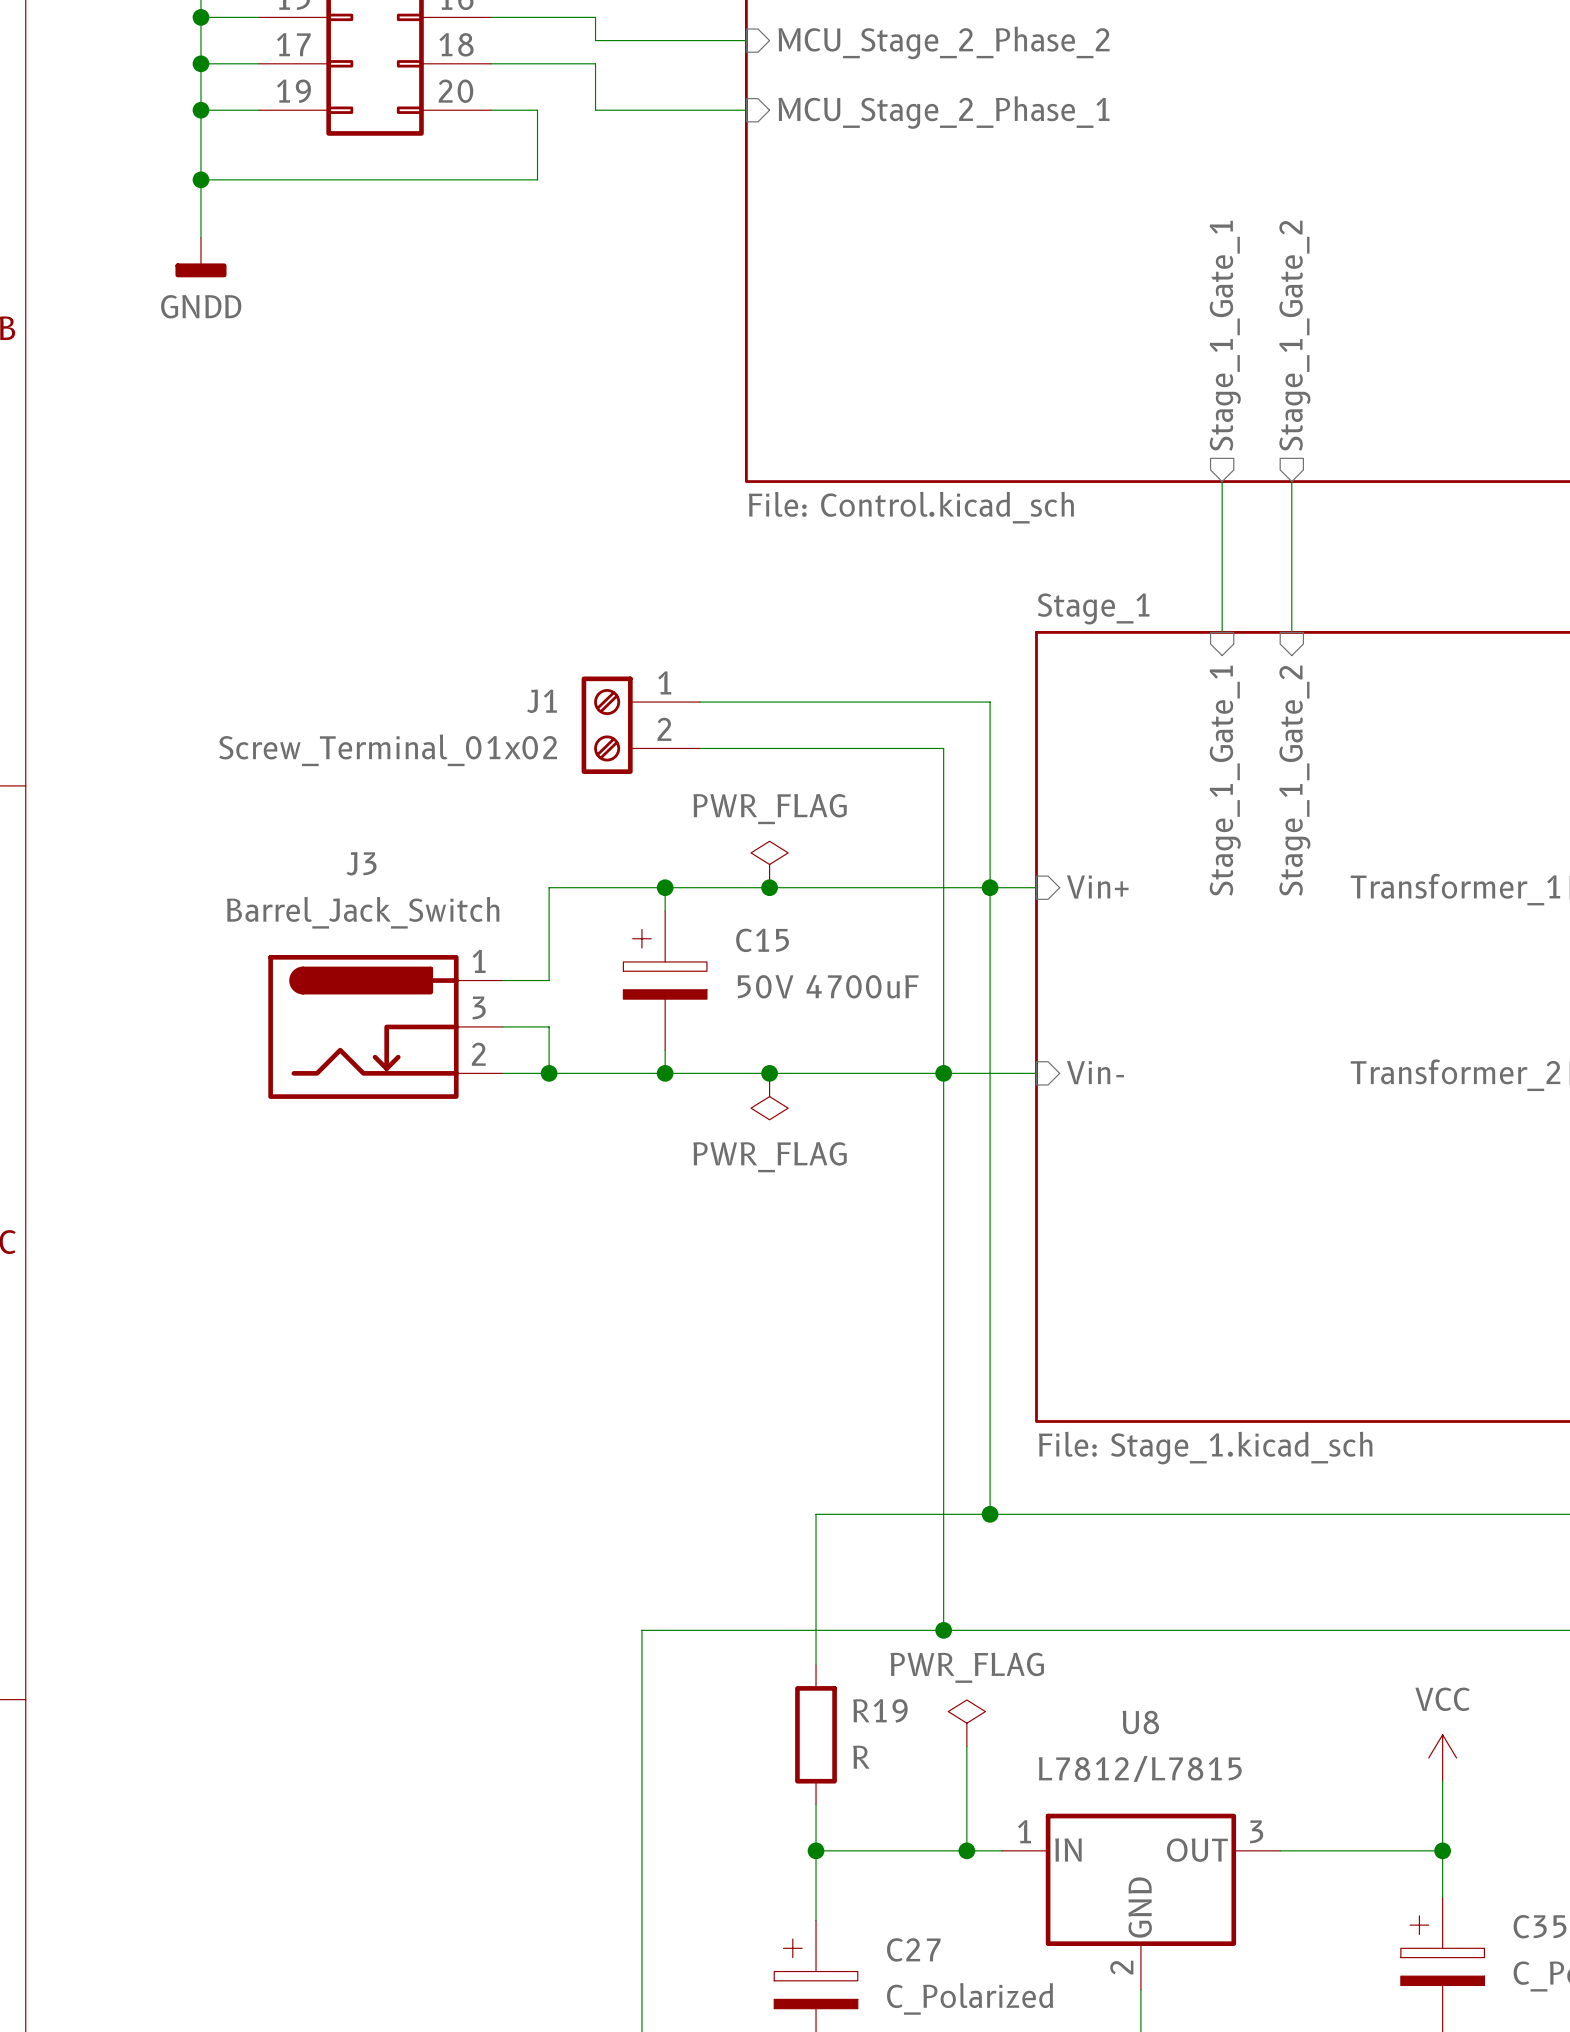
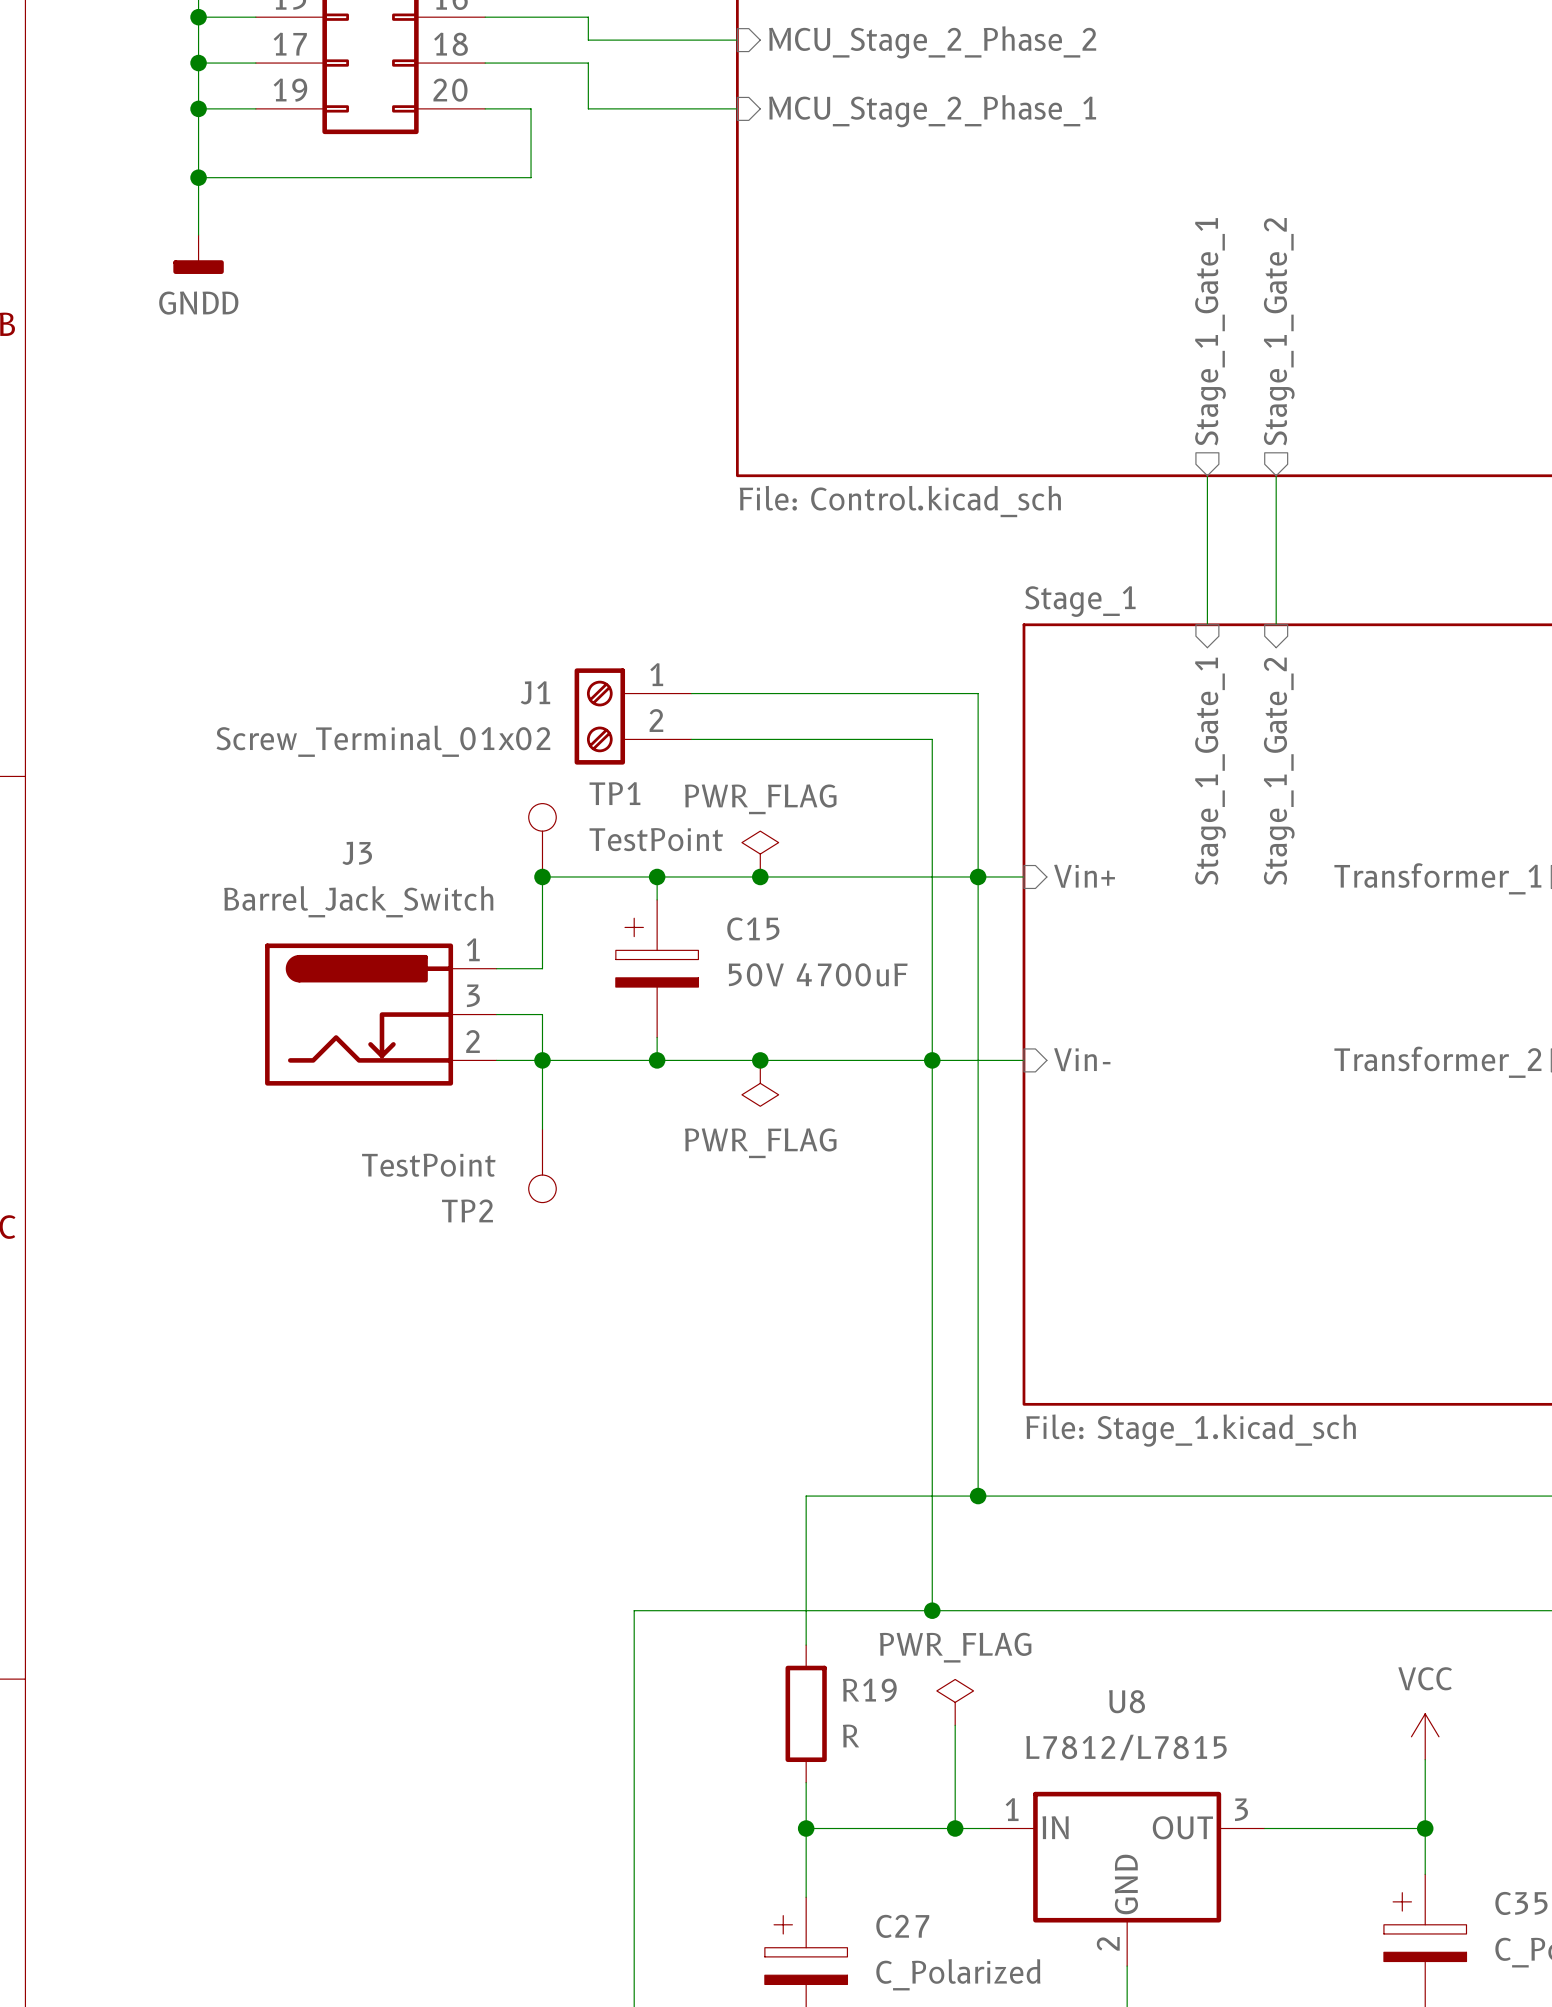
TP1: none -> TestPoint (542, 840)
junction: none -> (542, 876)
wire: none -> (542, 1060) (542, 1129)
TP2: none -> TestPoint (542, 1165)

